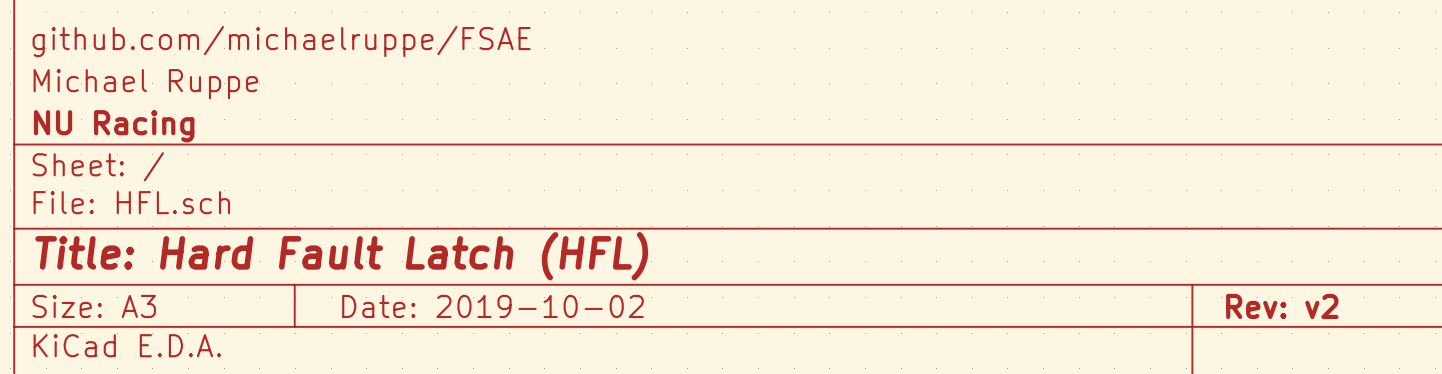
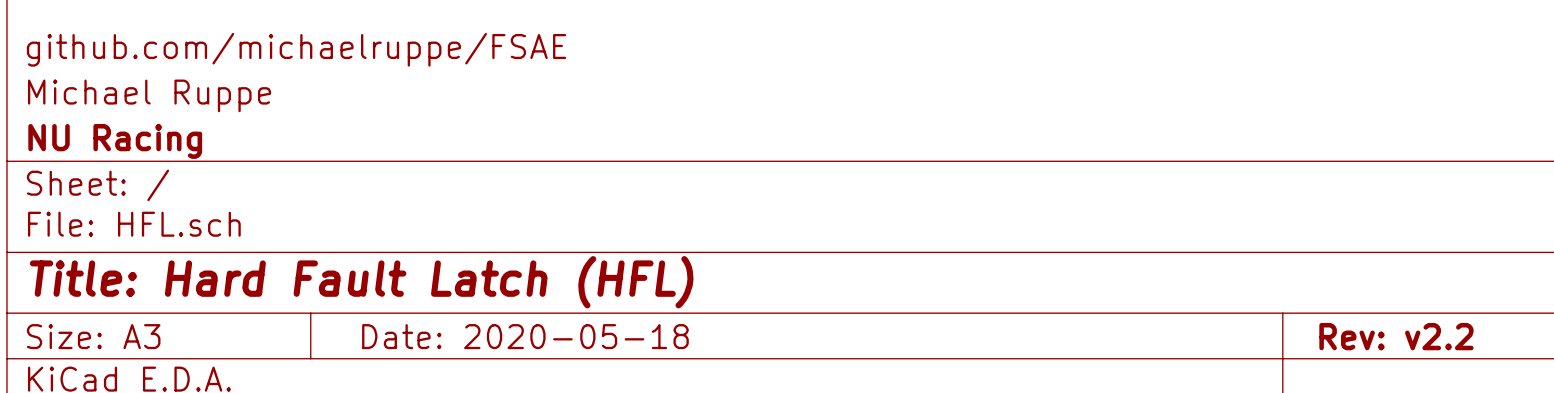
title block: Date: 2019-10-02 (492, 306) -> Date: 2020-05-18 (525, 336)
title block: Rev: v2 (1282, 306) -> Rev: v2.2 (1396, 336)

